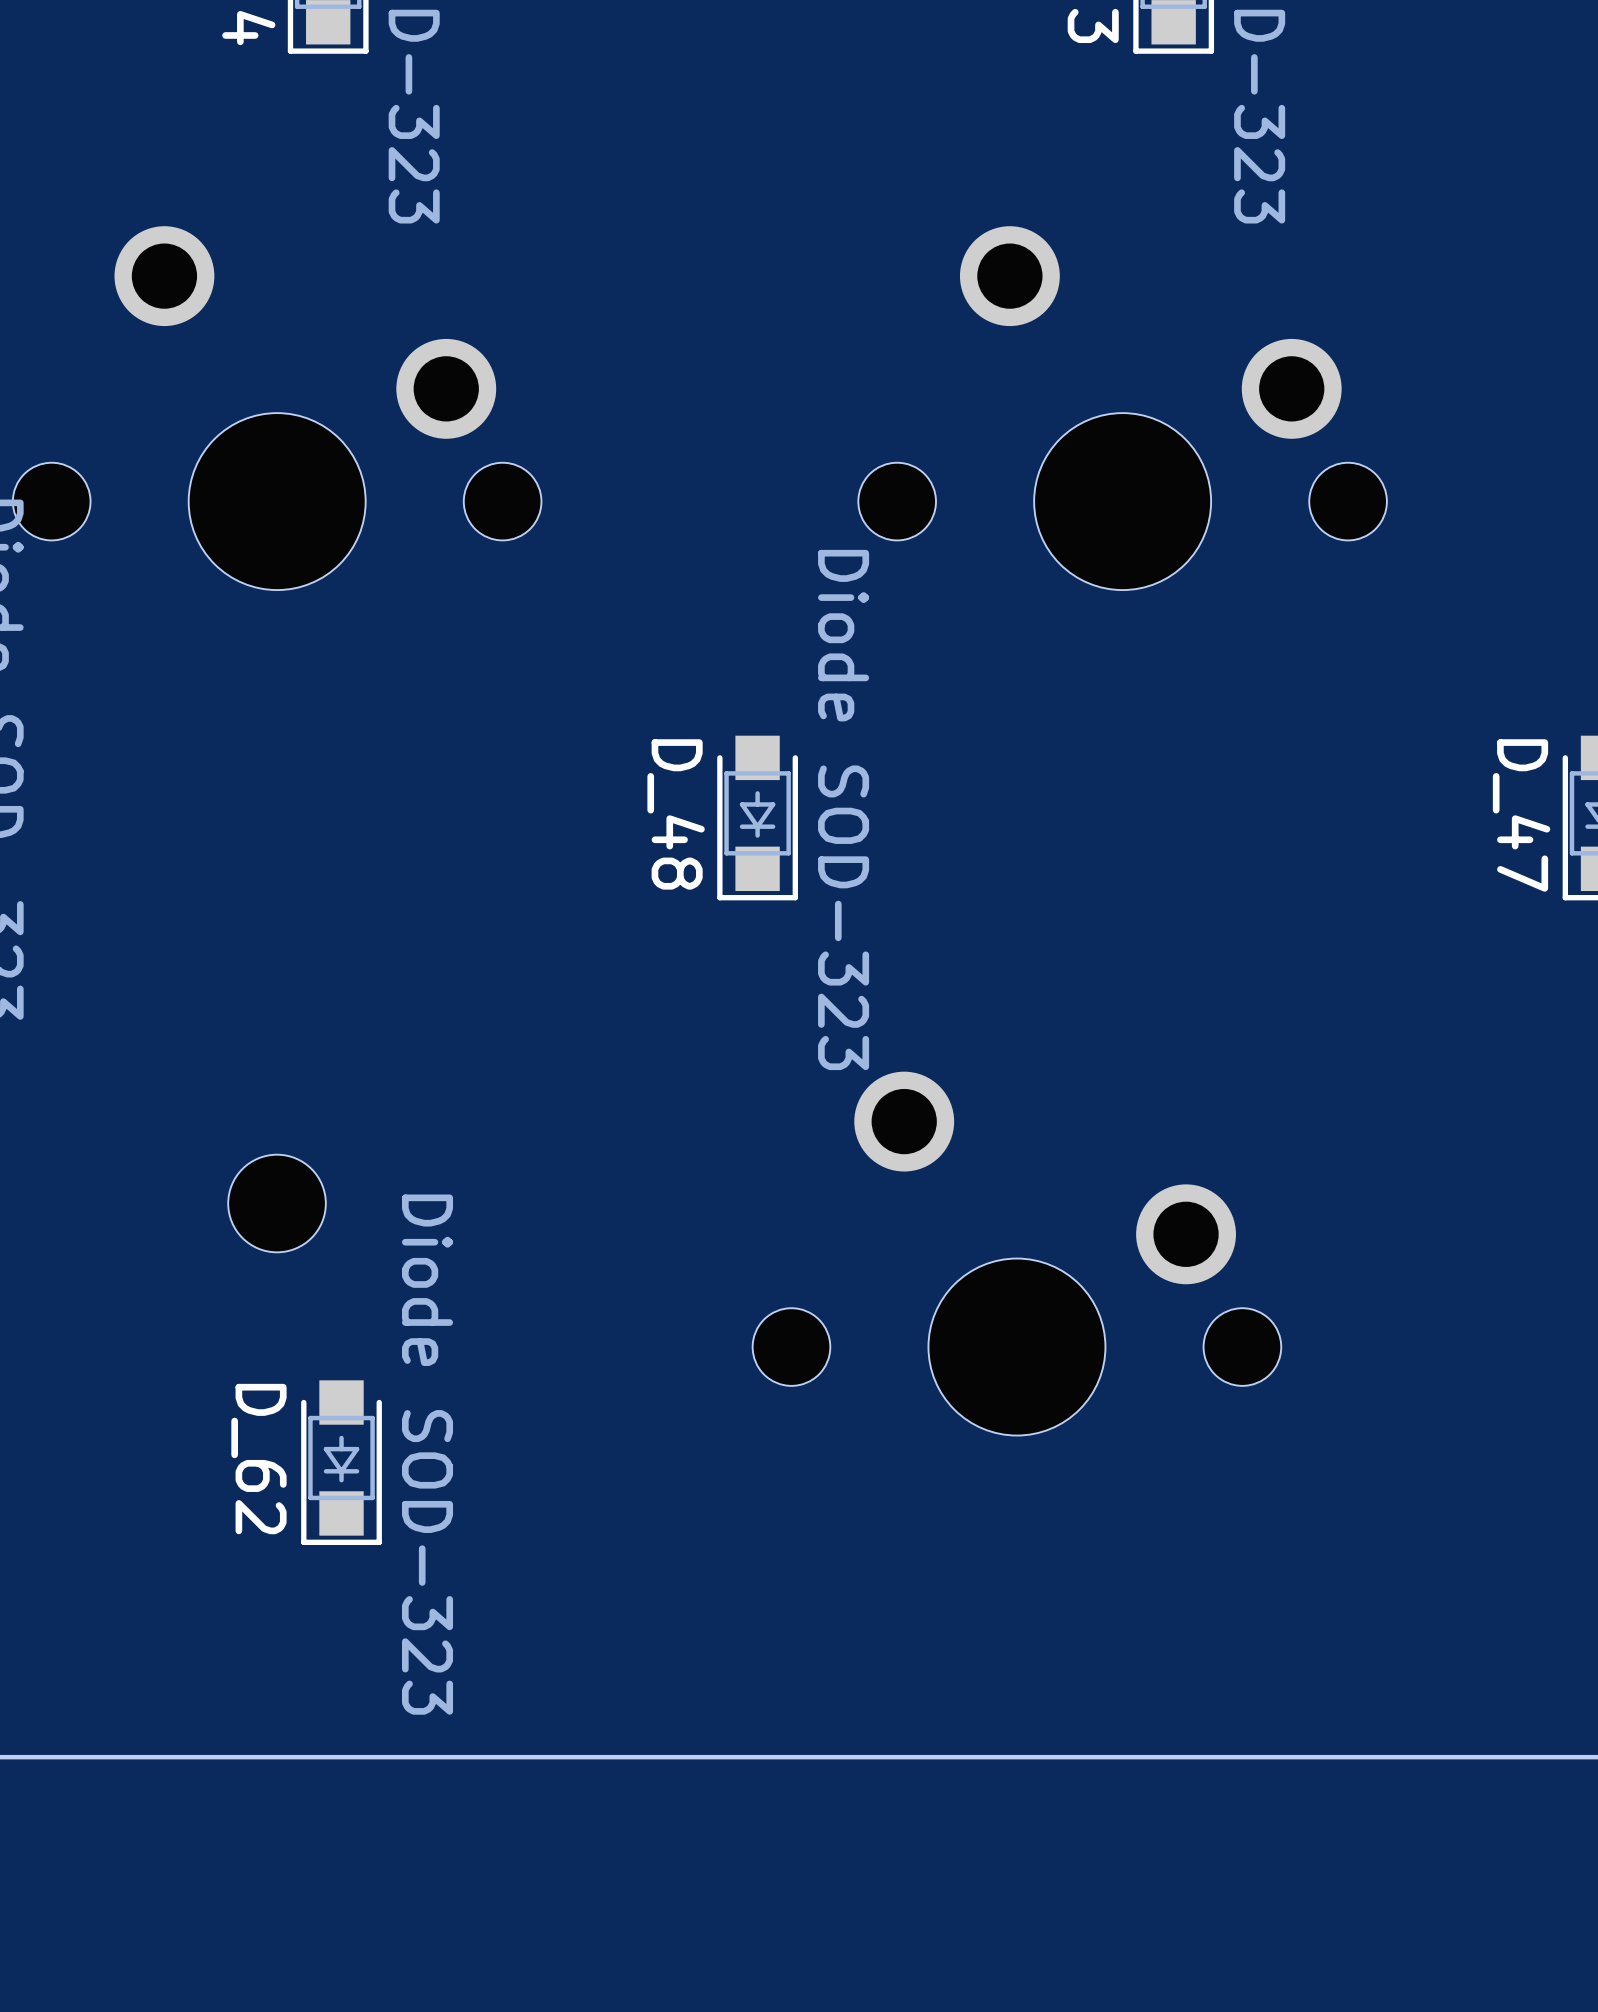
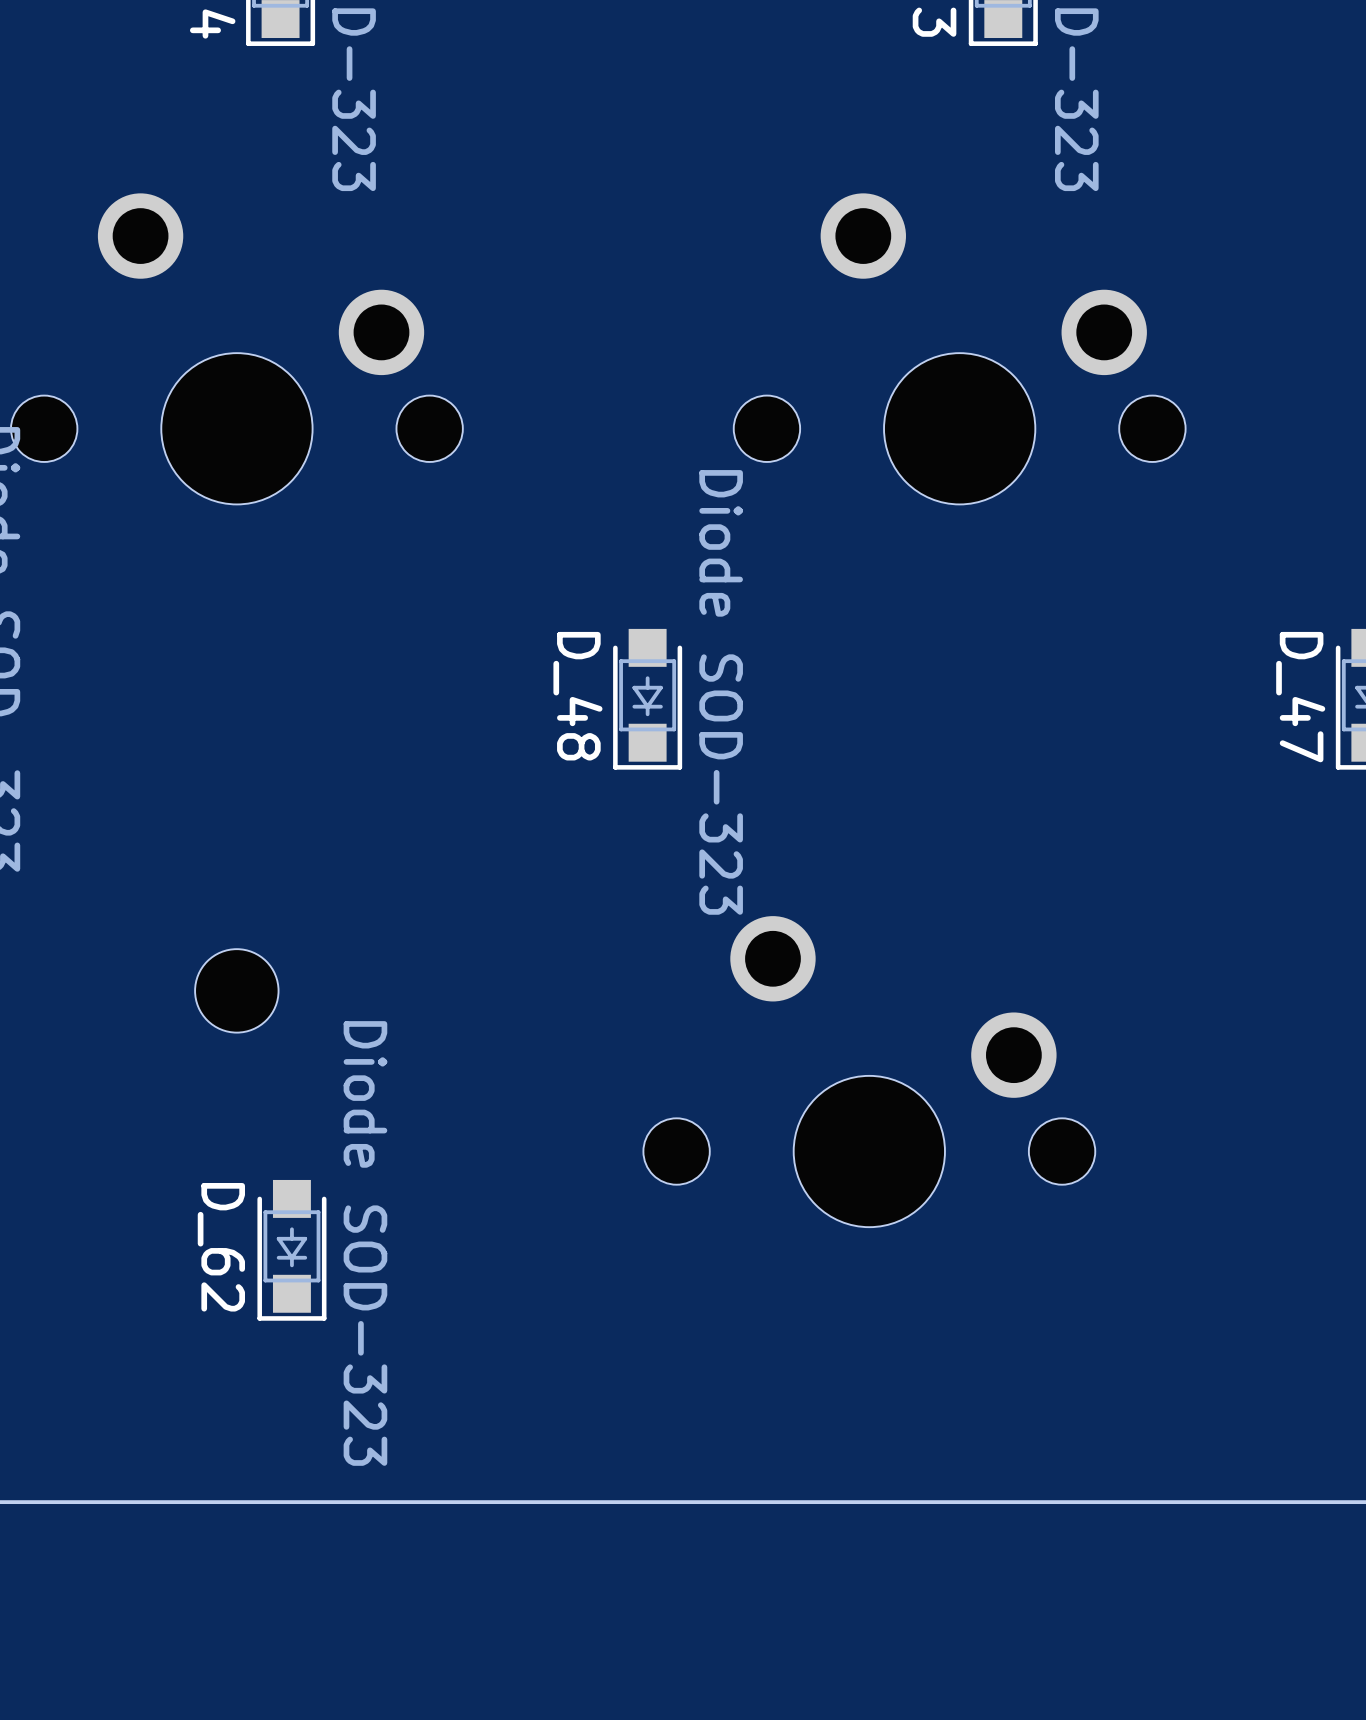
part position: (277, 1203) -> (236, 990)

